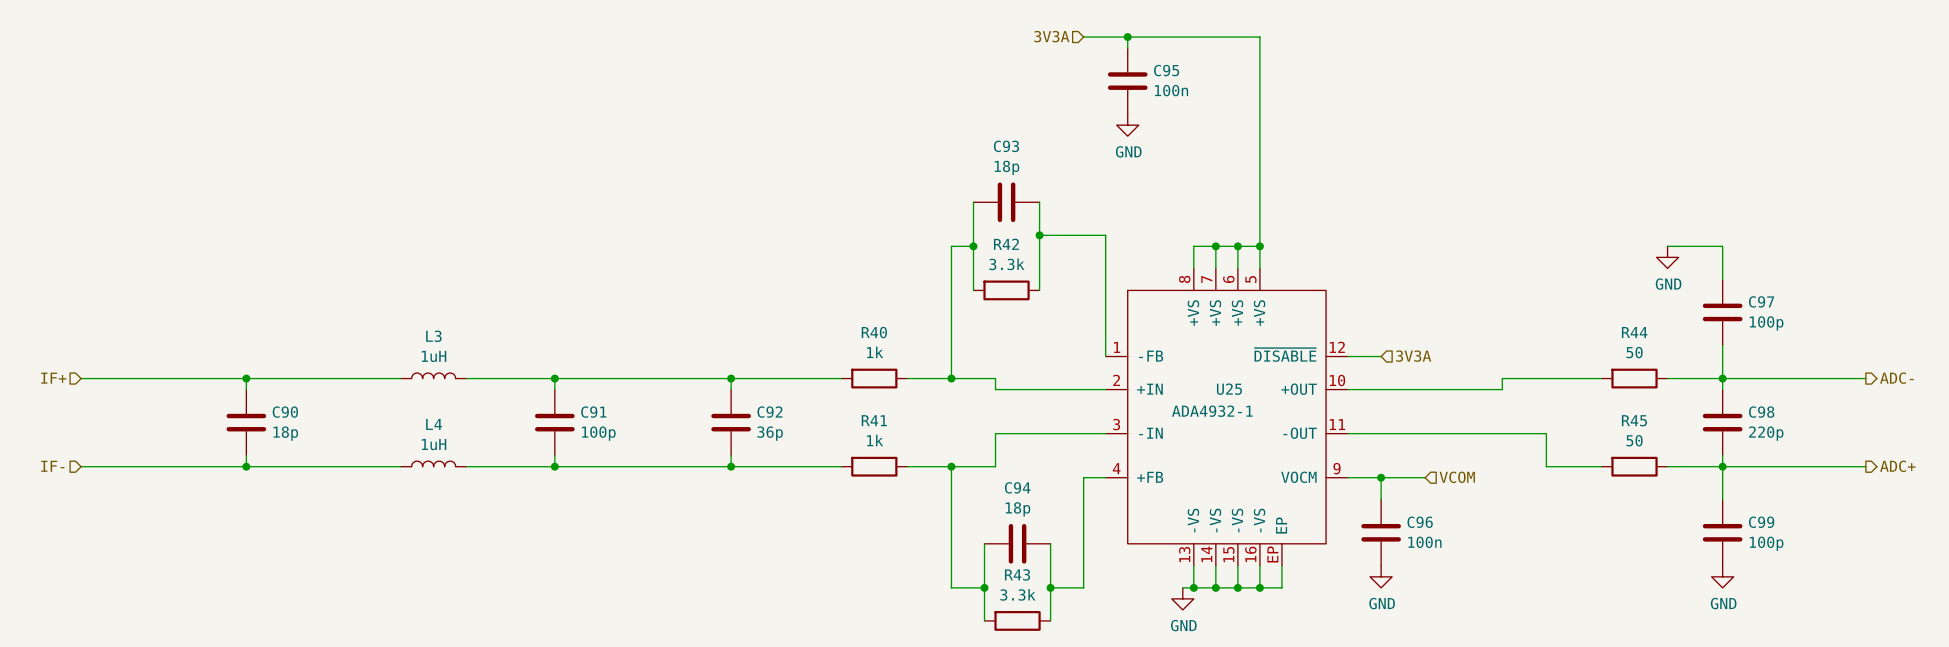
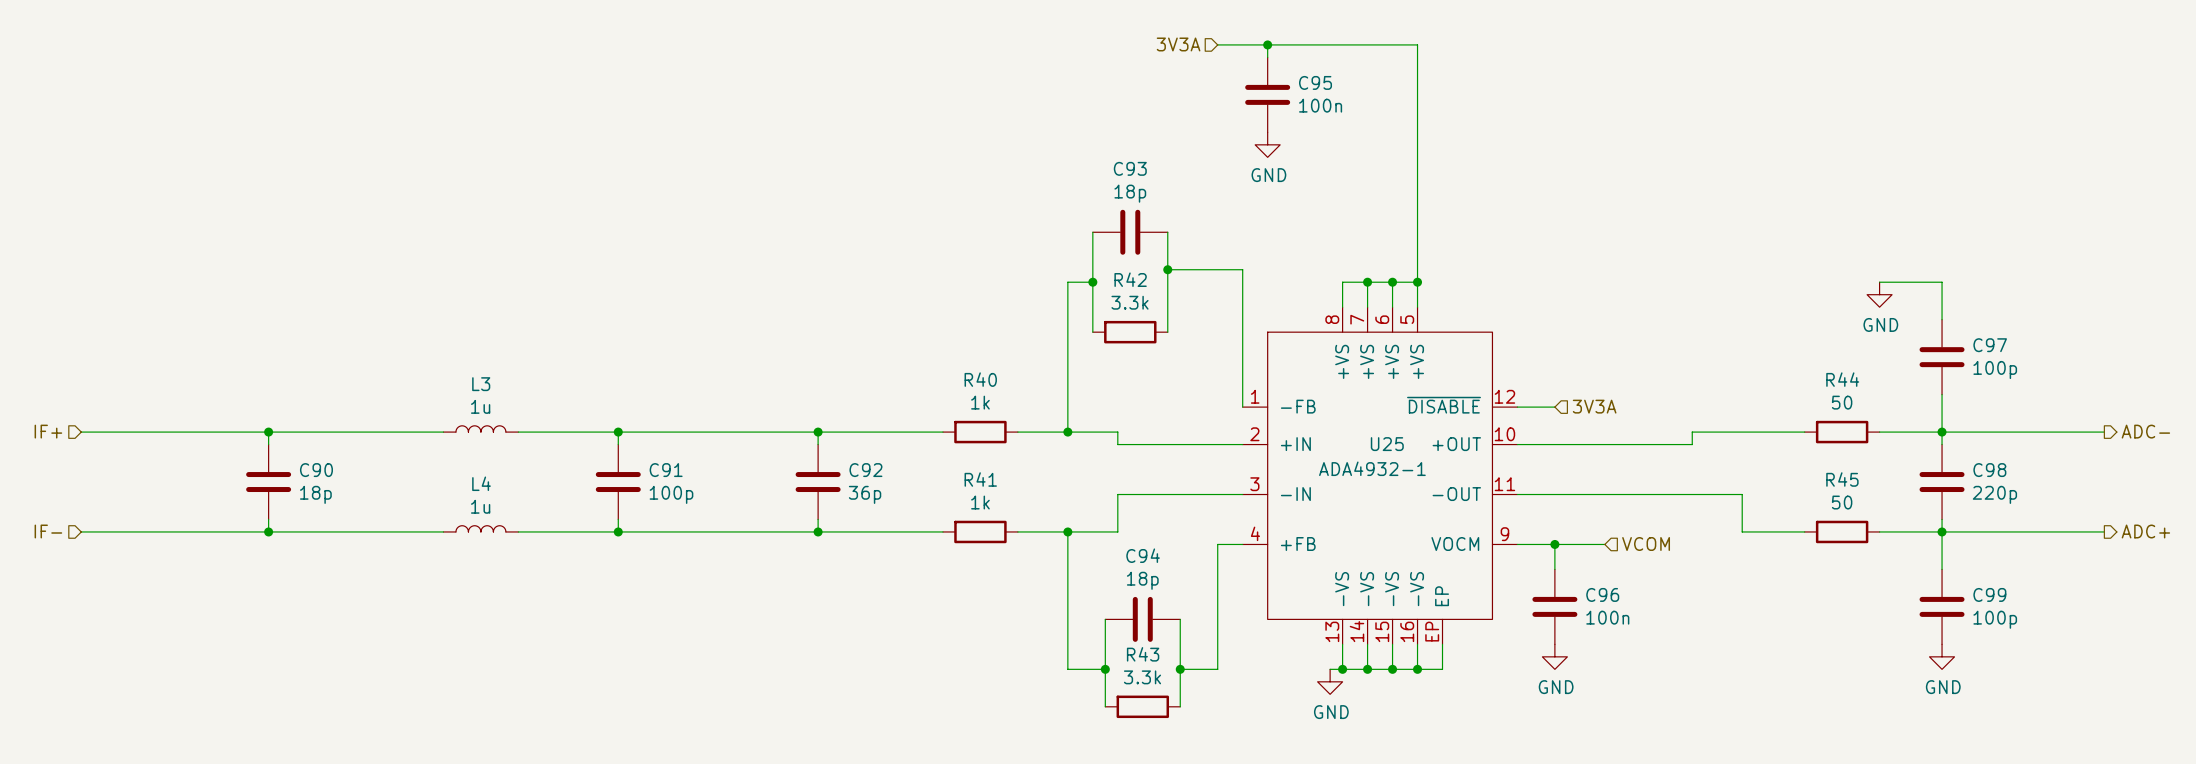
L3 value: 1uH (434, 356) -> 1u (480, 406)
L4 value: 1uH (434, 444) -> 1u (480, 506)

